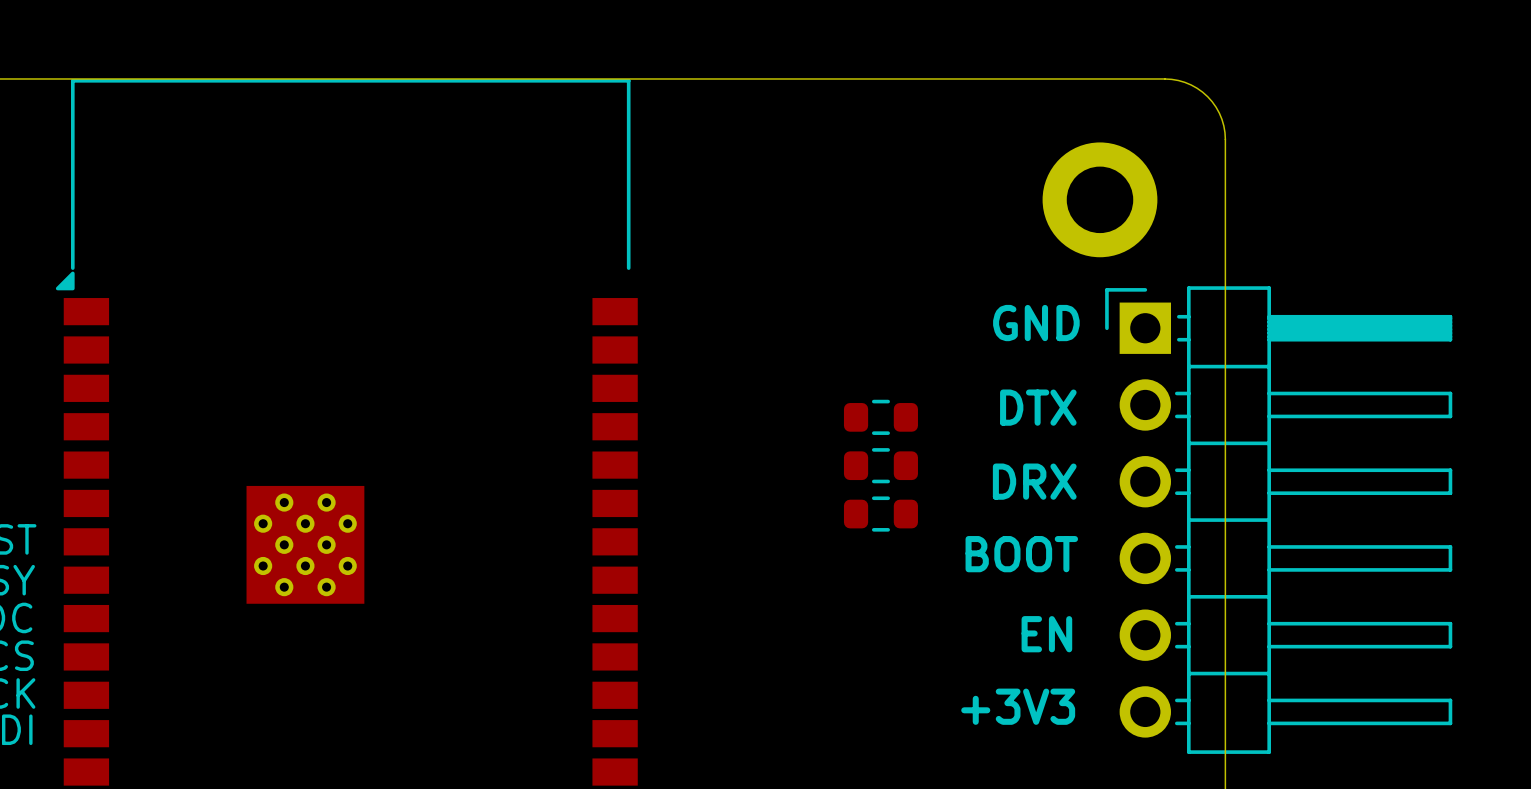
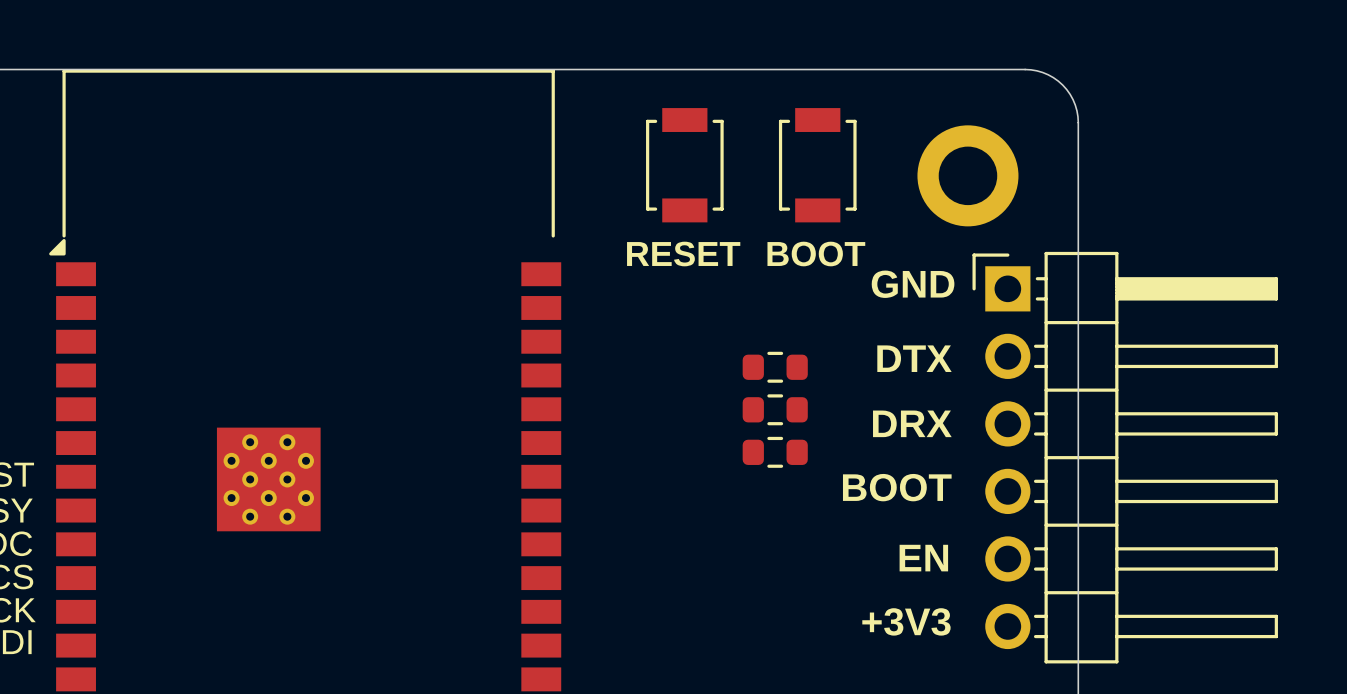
part: none -> (684, 165)
part: none -> (817, 165)
text: none -> RESET (683, 254)
text: none -> BOOT (816, 254)

